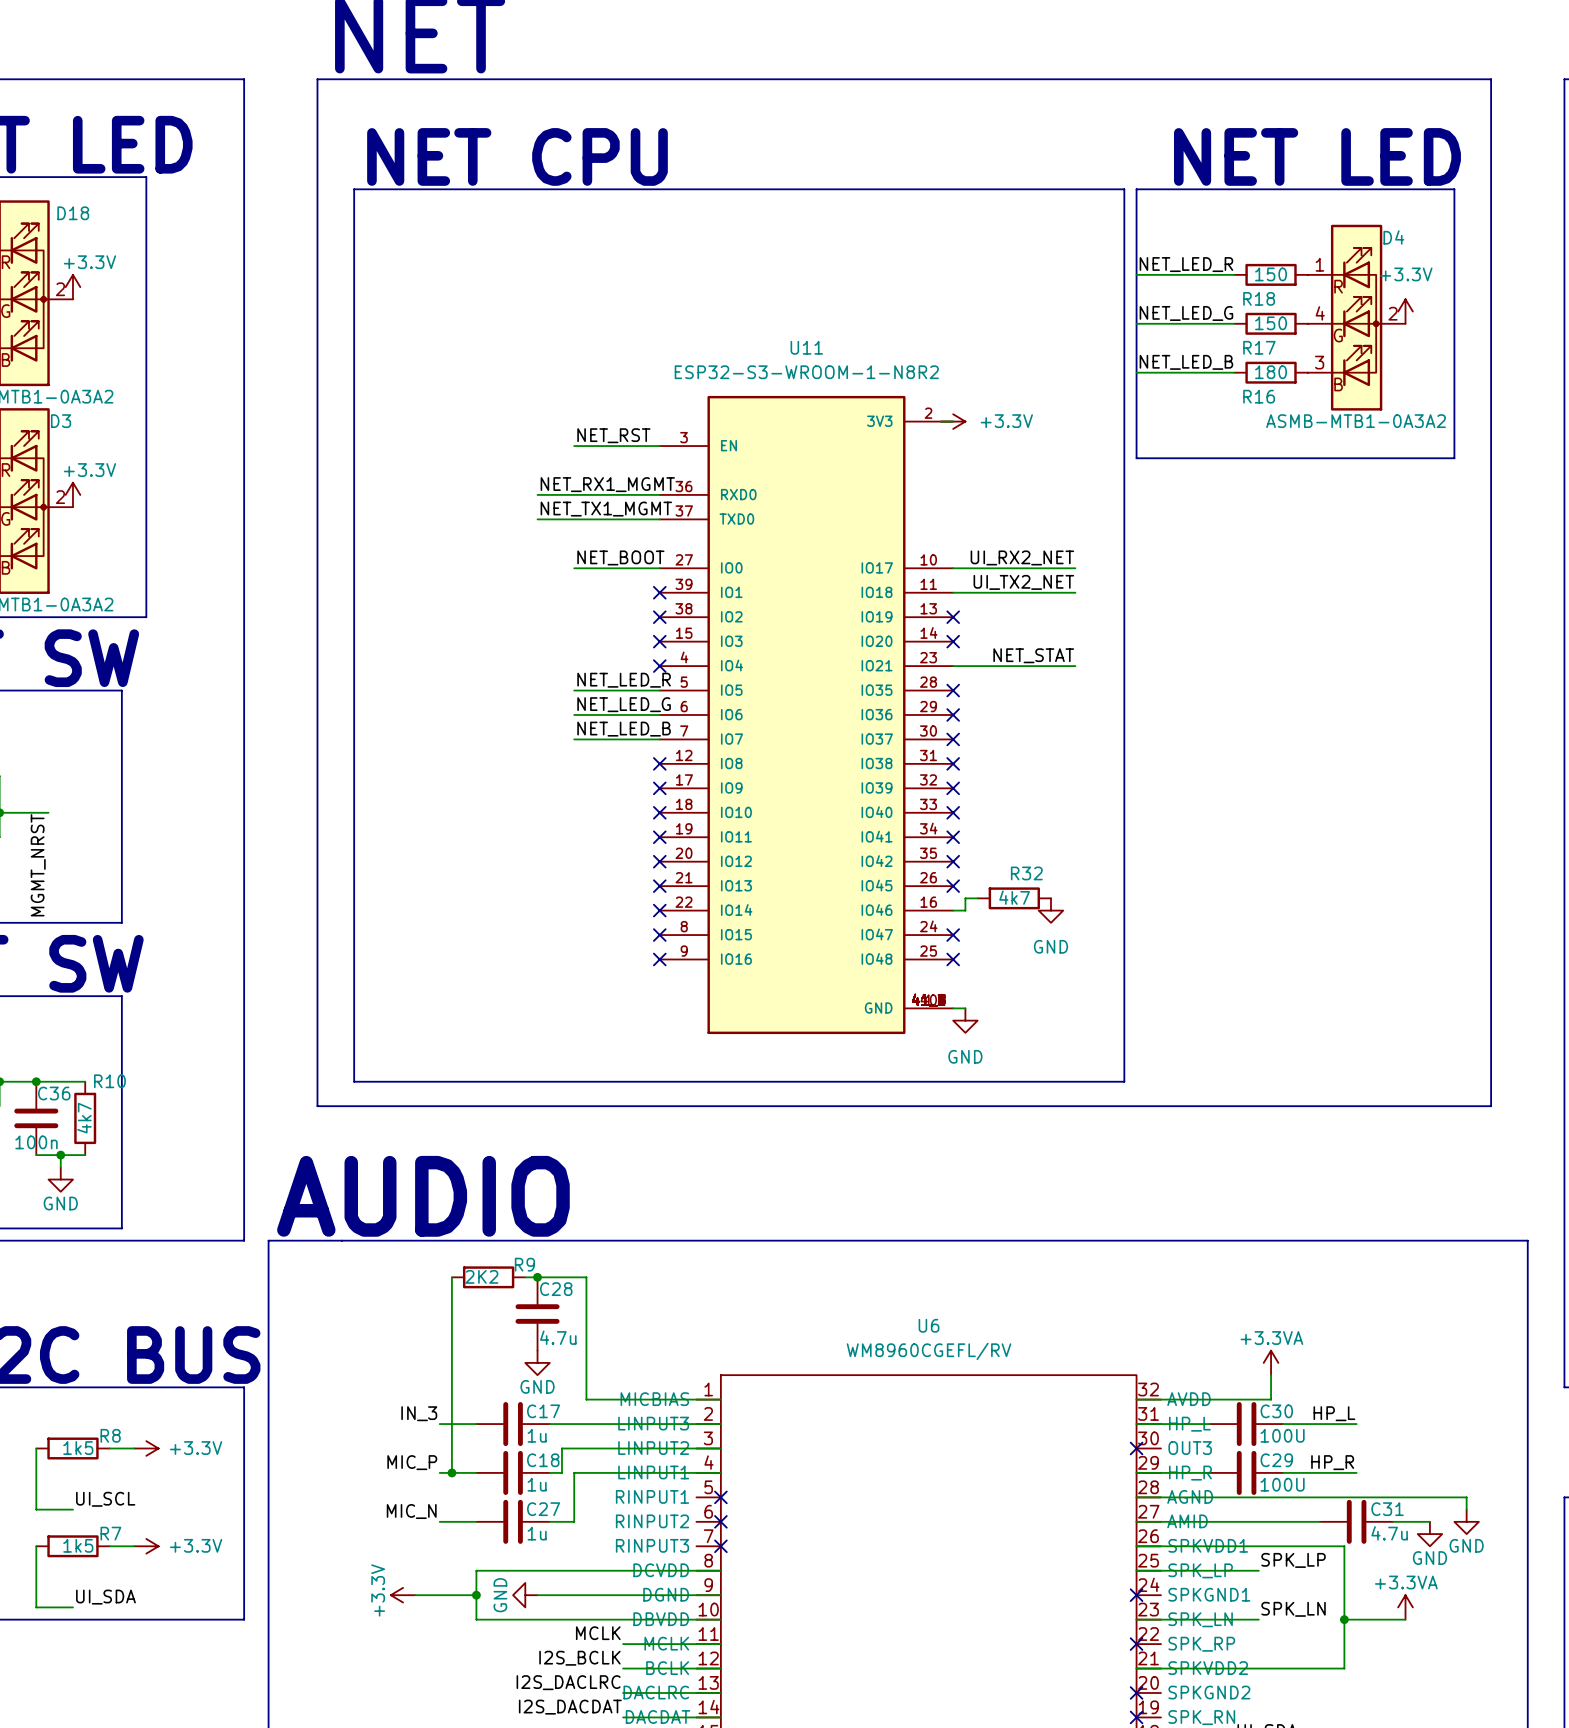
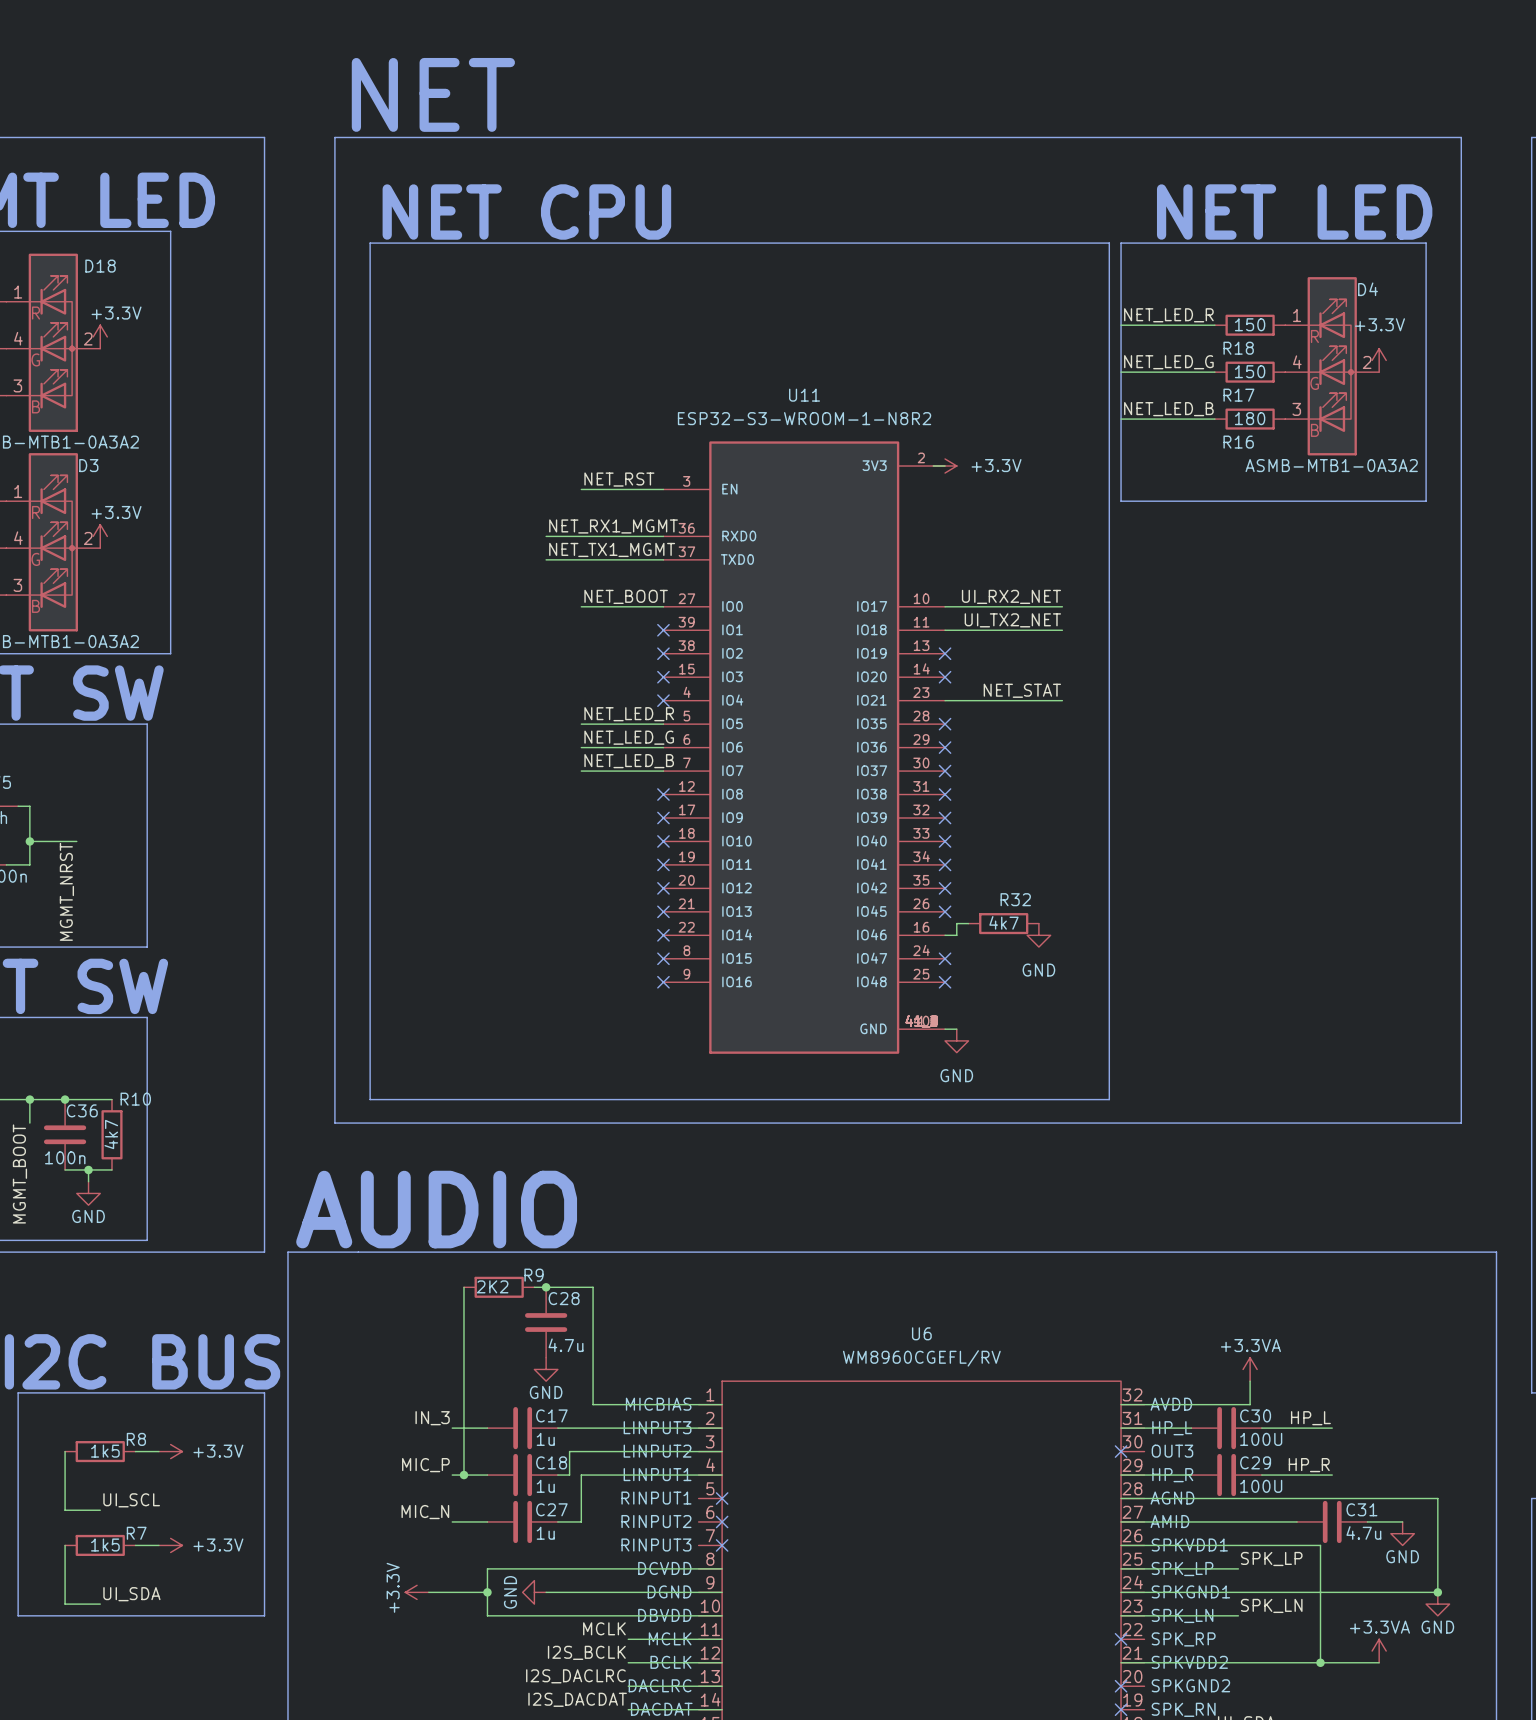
wire: none -> (1437, 1510) (1437, 1592) (1121, 1592)
power symbol position: GND (1466, 1521) -> GND (1437, 1604)
no-connect mark: (1136, 1595) -> none
junction: none -> (1437, 1592)
power symbol position: +3.3VA (1405, 1607) -> +3.3VA (1379, 1651)
wire: (1344, 1619) (1405, 1619) -> (1320, 1662) (1379, 1662)
junction position: (1344, 1619) -> (1320, 1662)

